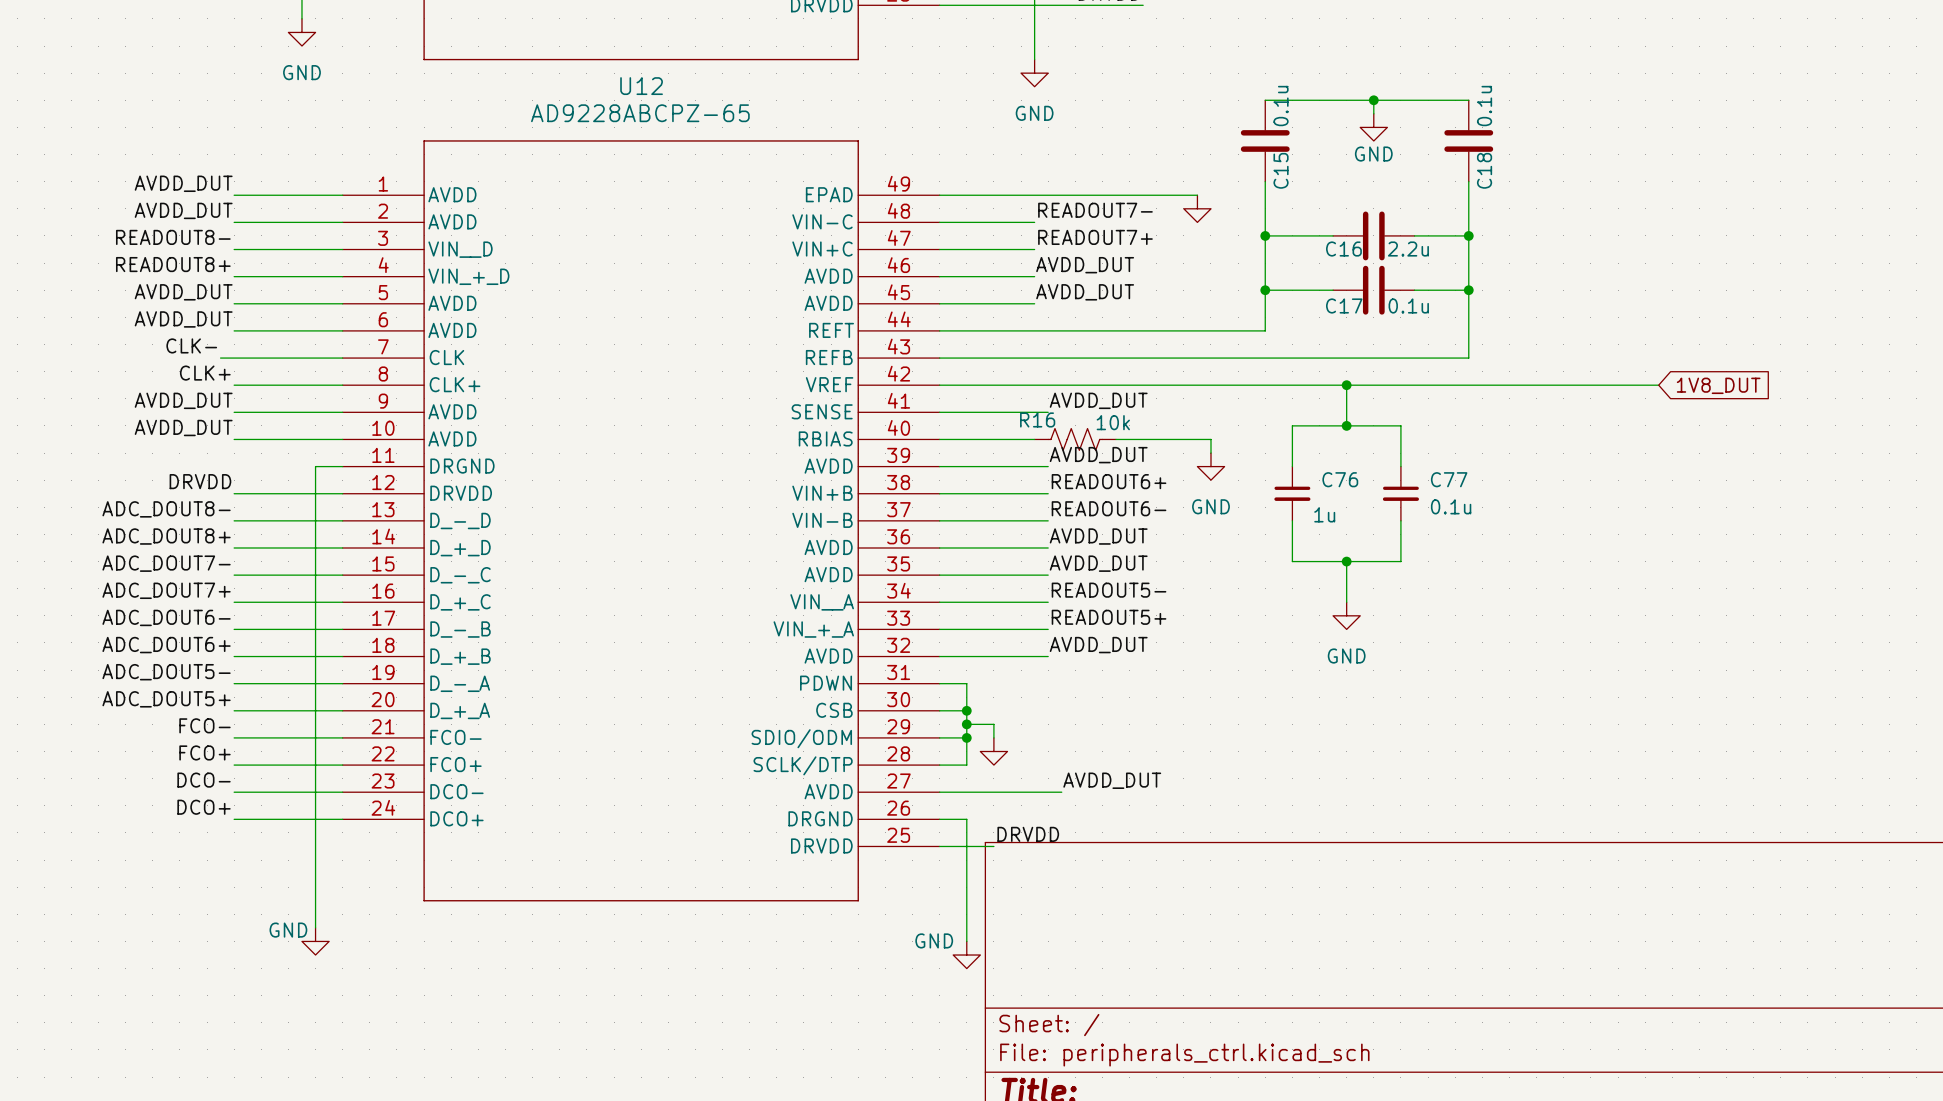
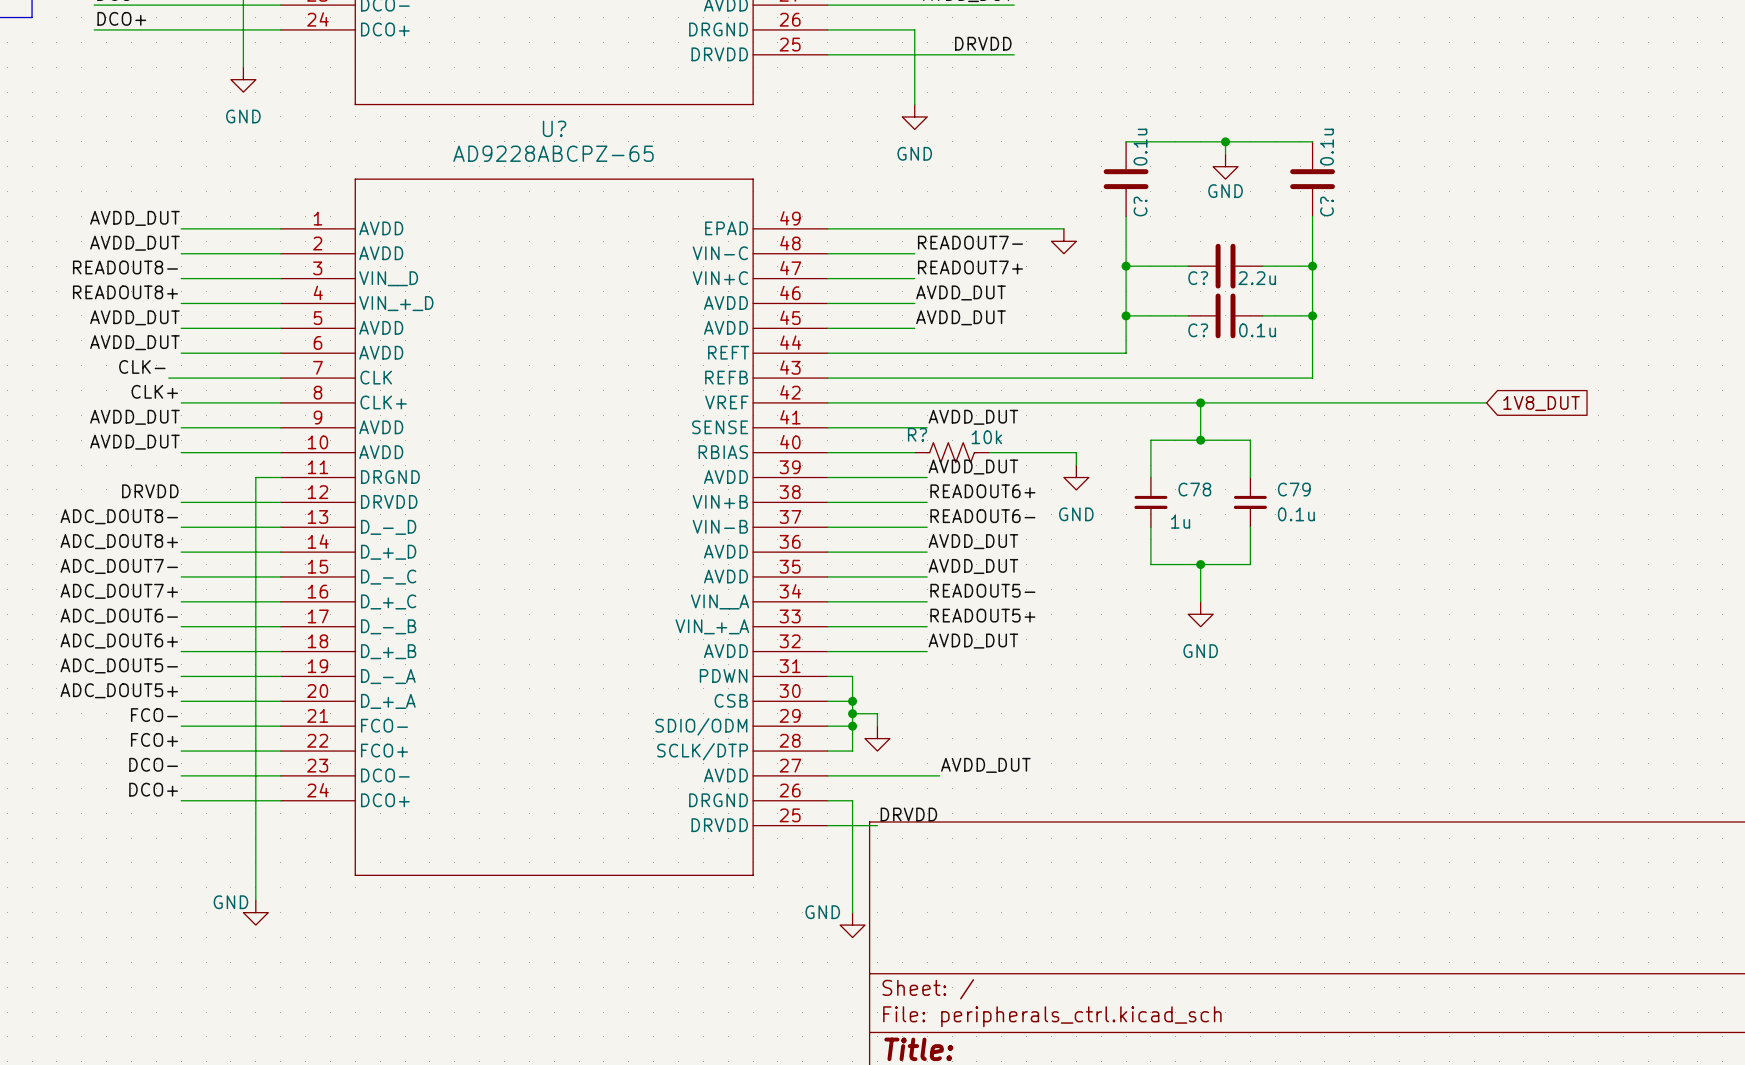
U12 name: U12 (641, 86) -> U? (554, 128)
C15 name: C15 (1281, 170) -> C? (1140, 206)
C18 name: C18 (1484, 170) -> C? (1327, 206)
C16 name: C16 (1343, 249) -> C? (1198, 278)
C17 name: C17 (1344, 305) -> C? (1198, 330)
R16 name: R16 (1037, 419) -> R? (917, 434)
C76 name: C76 (1340, 479) -> C78 (1194, 489)
C77 name: C77 (1449, 479) -> C79 (1294, 489)

